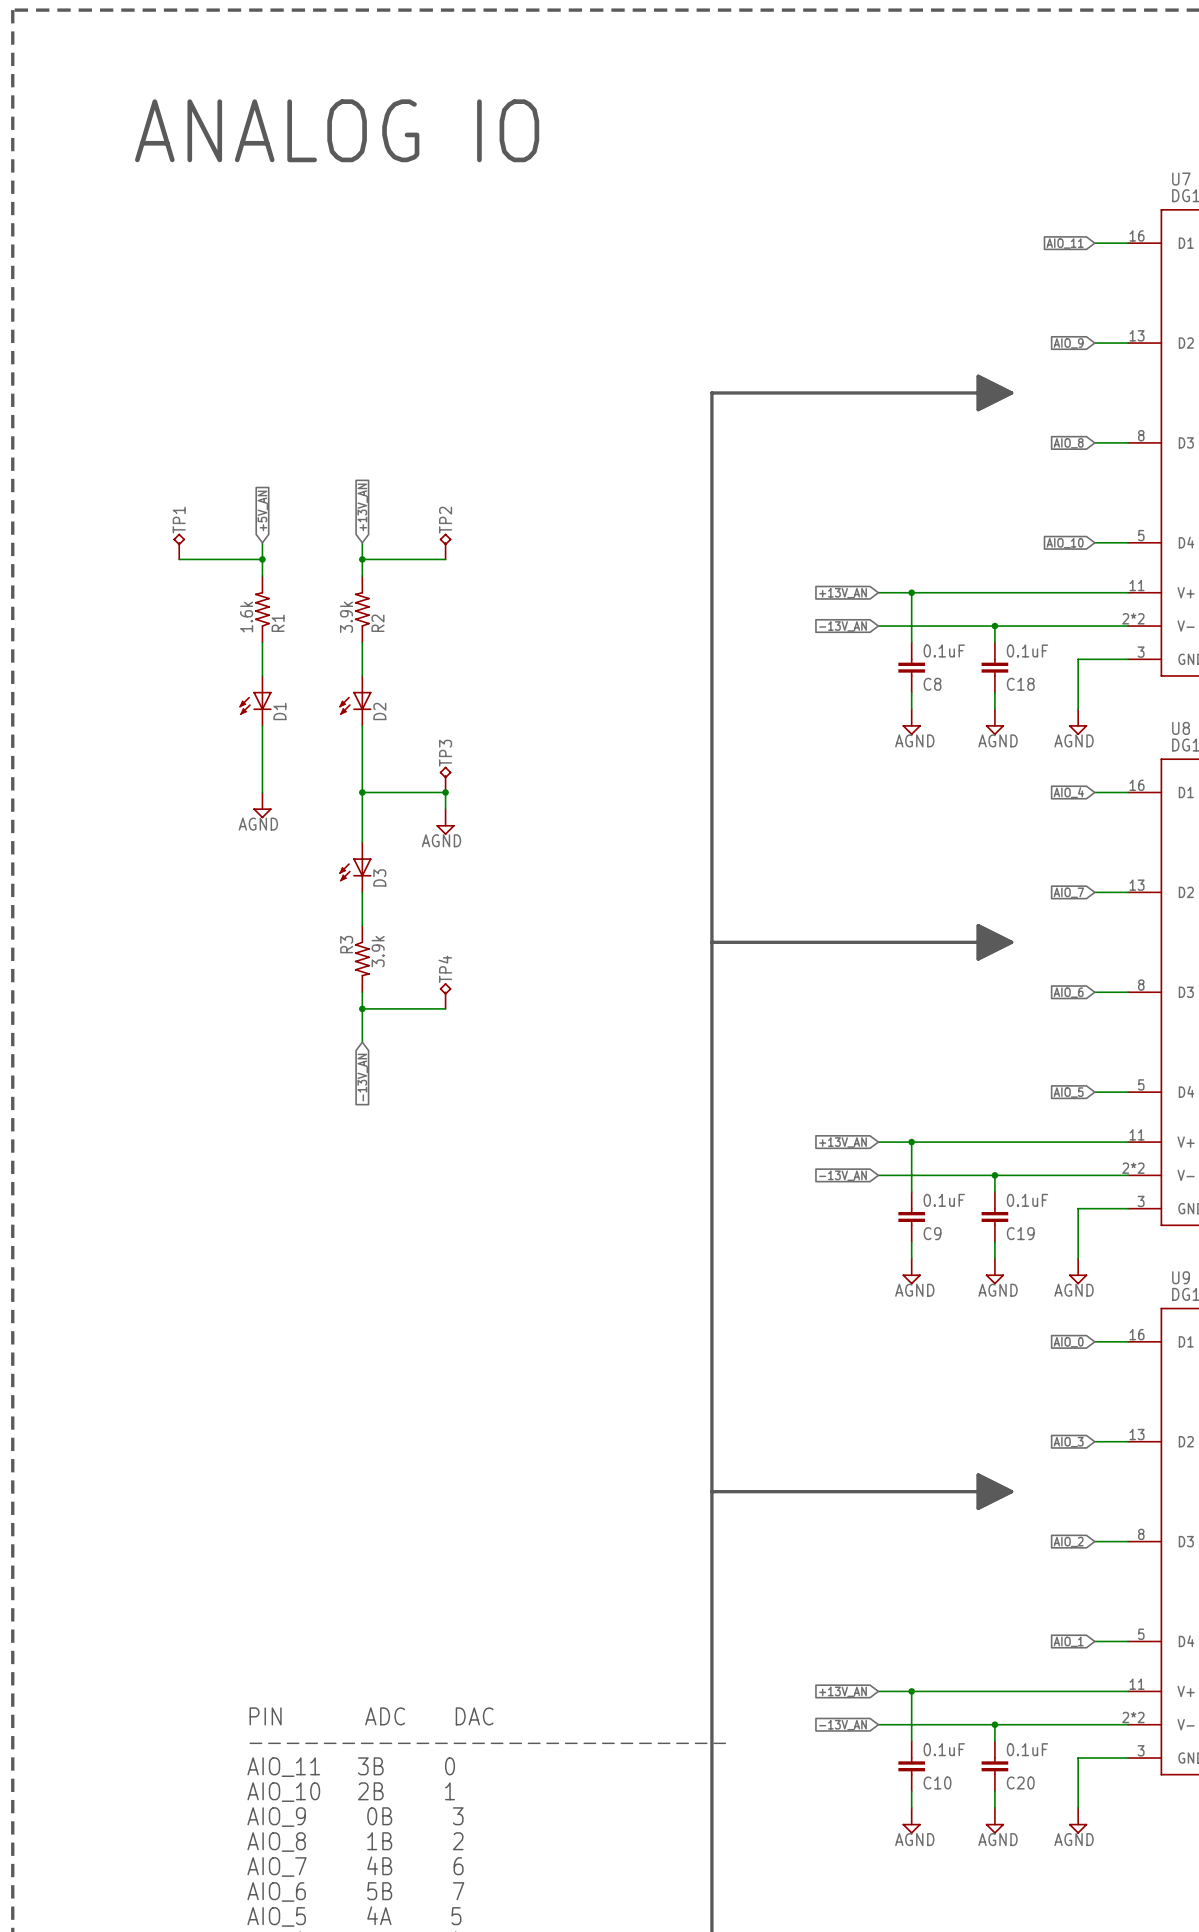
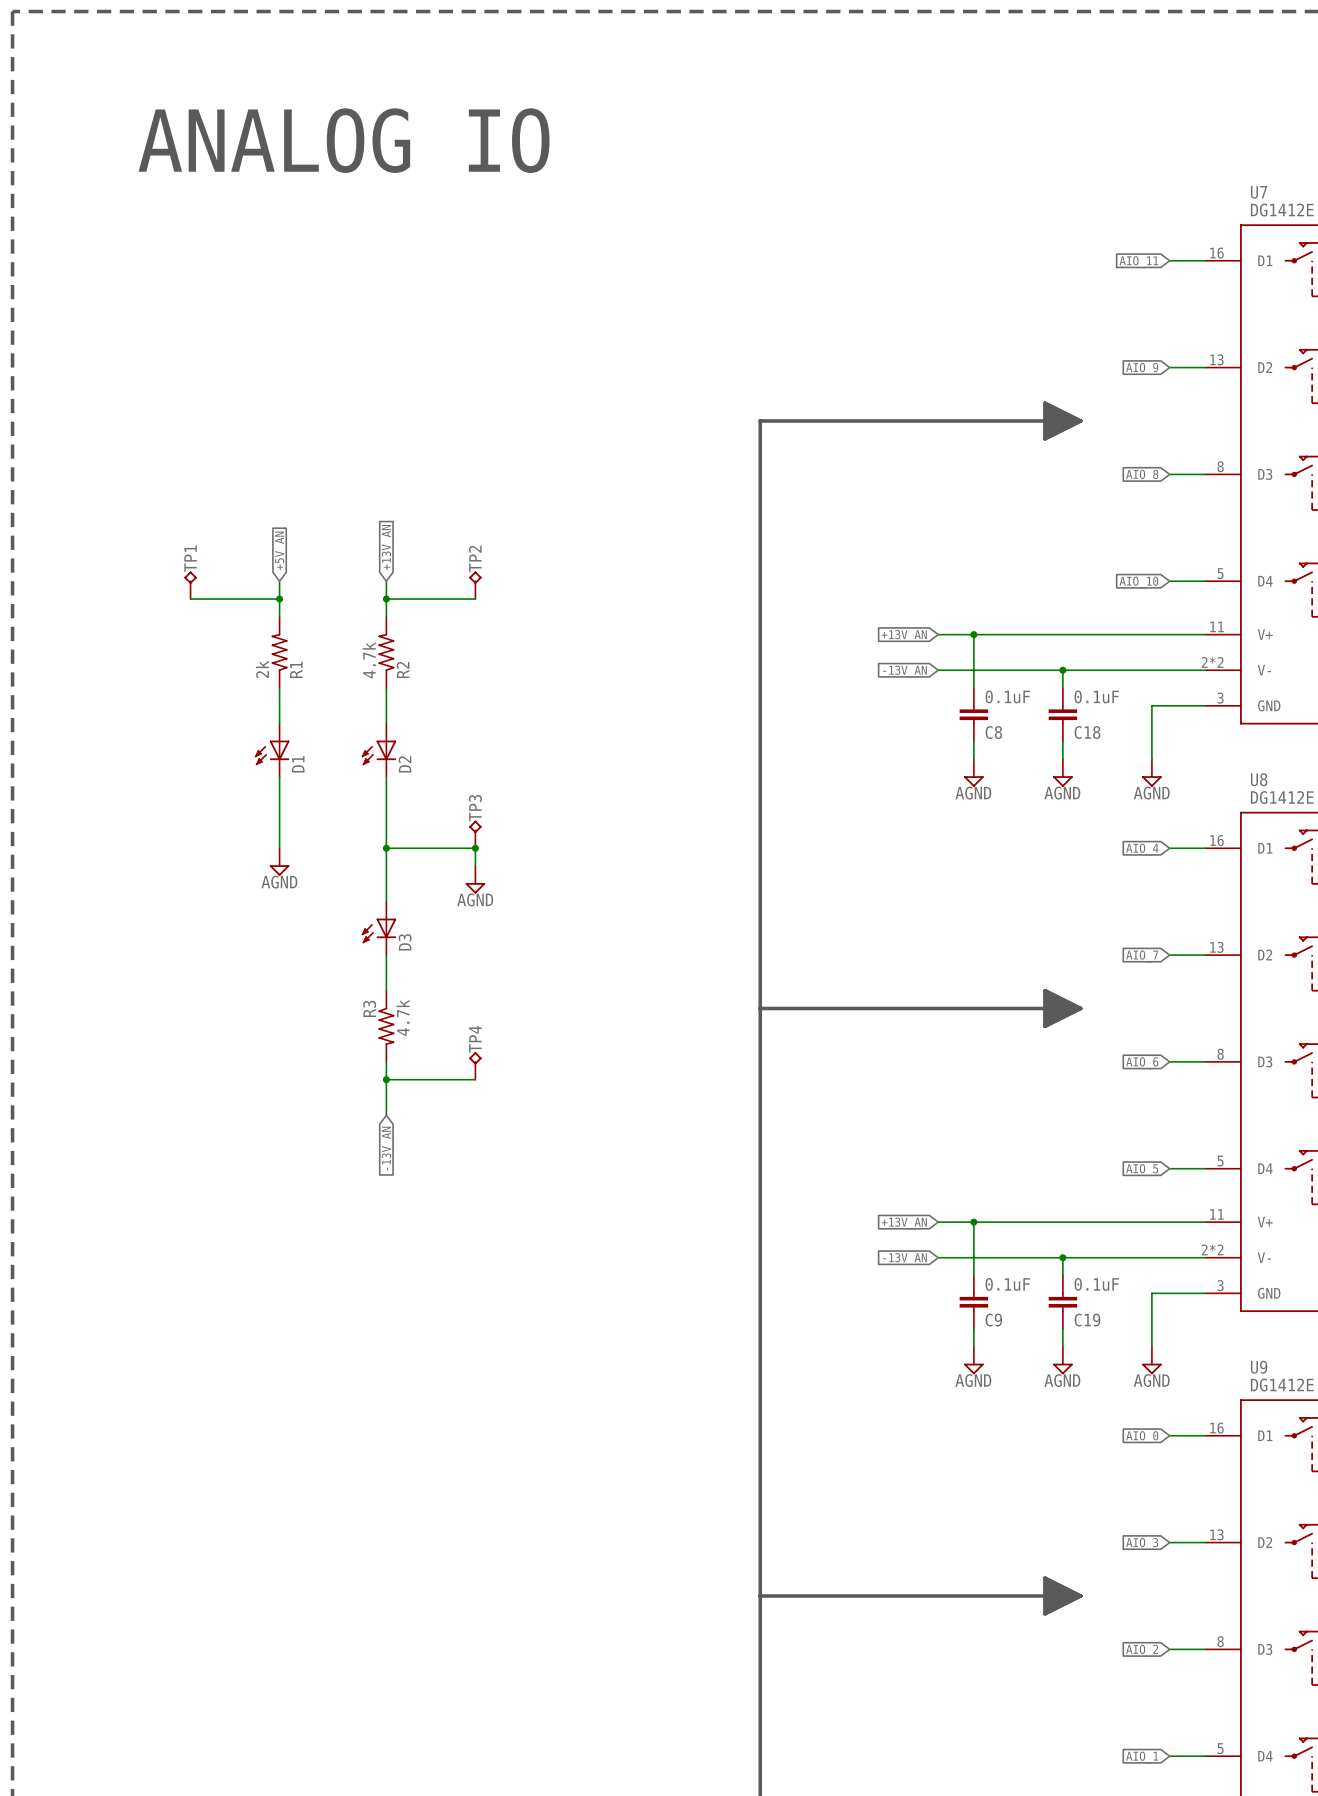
R1 value: 1.6k (246, 617) -> 2k (262, 669)
R2 value: 3.9k (346, 617) -> 4.7k (369, 660)
R3 value: 3.9k (378, 951) -> 4.7k (403, 1017)

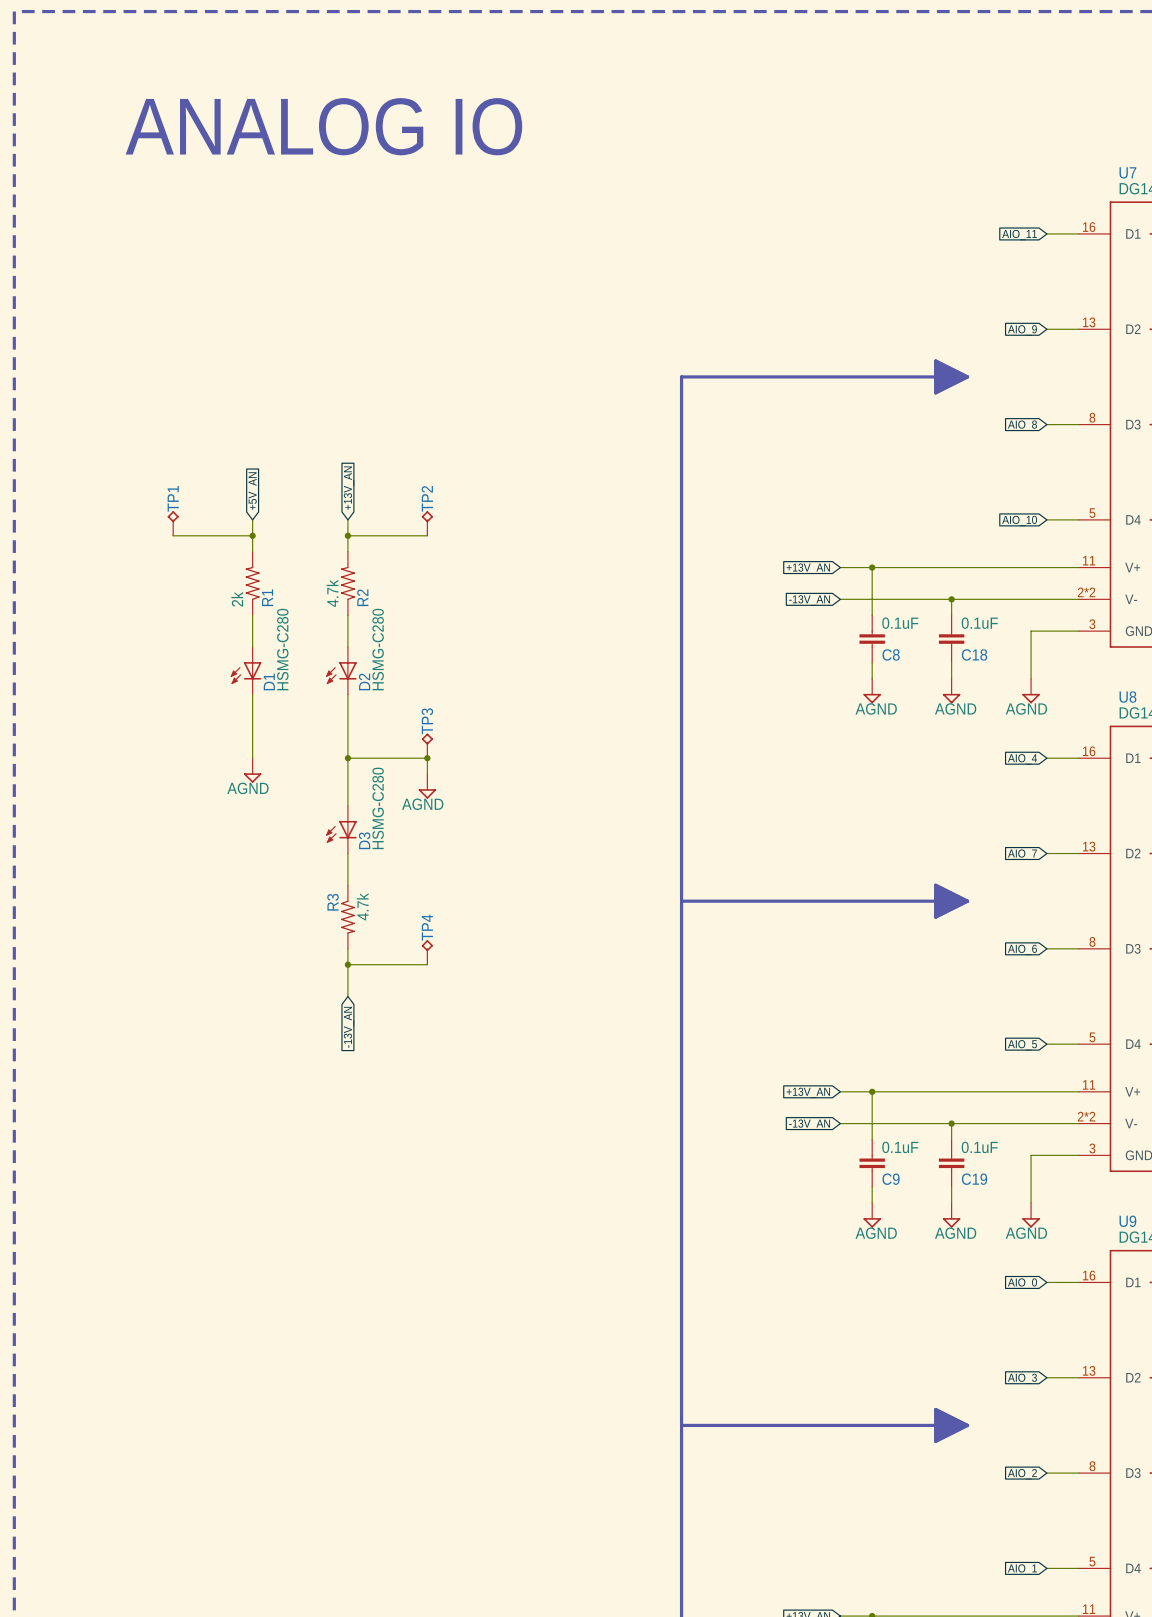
D1 value: none -> HSMG-C280 (282, 649)
D2 value: none -> HSMG-C280 (378, 649)
D3 value: none -> HSMG-C280 (378, 808)

